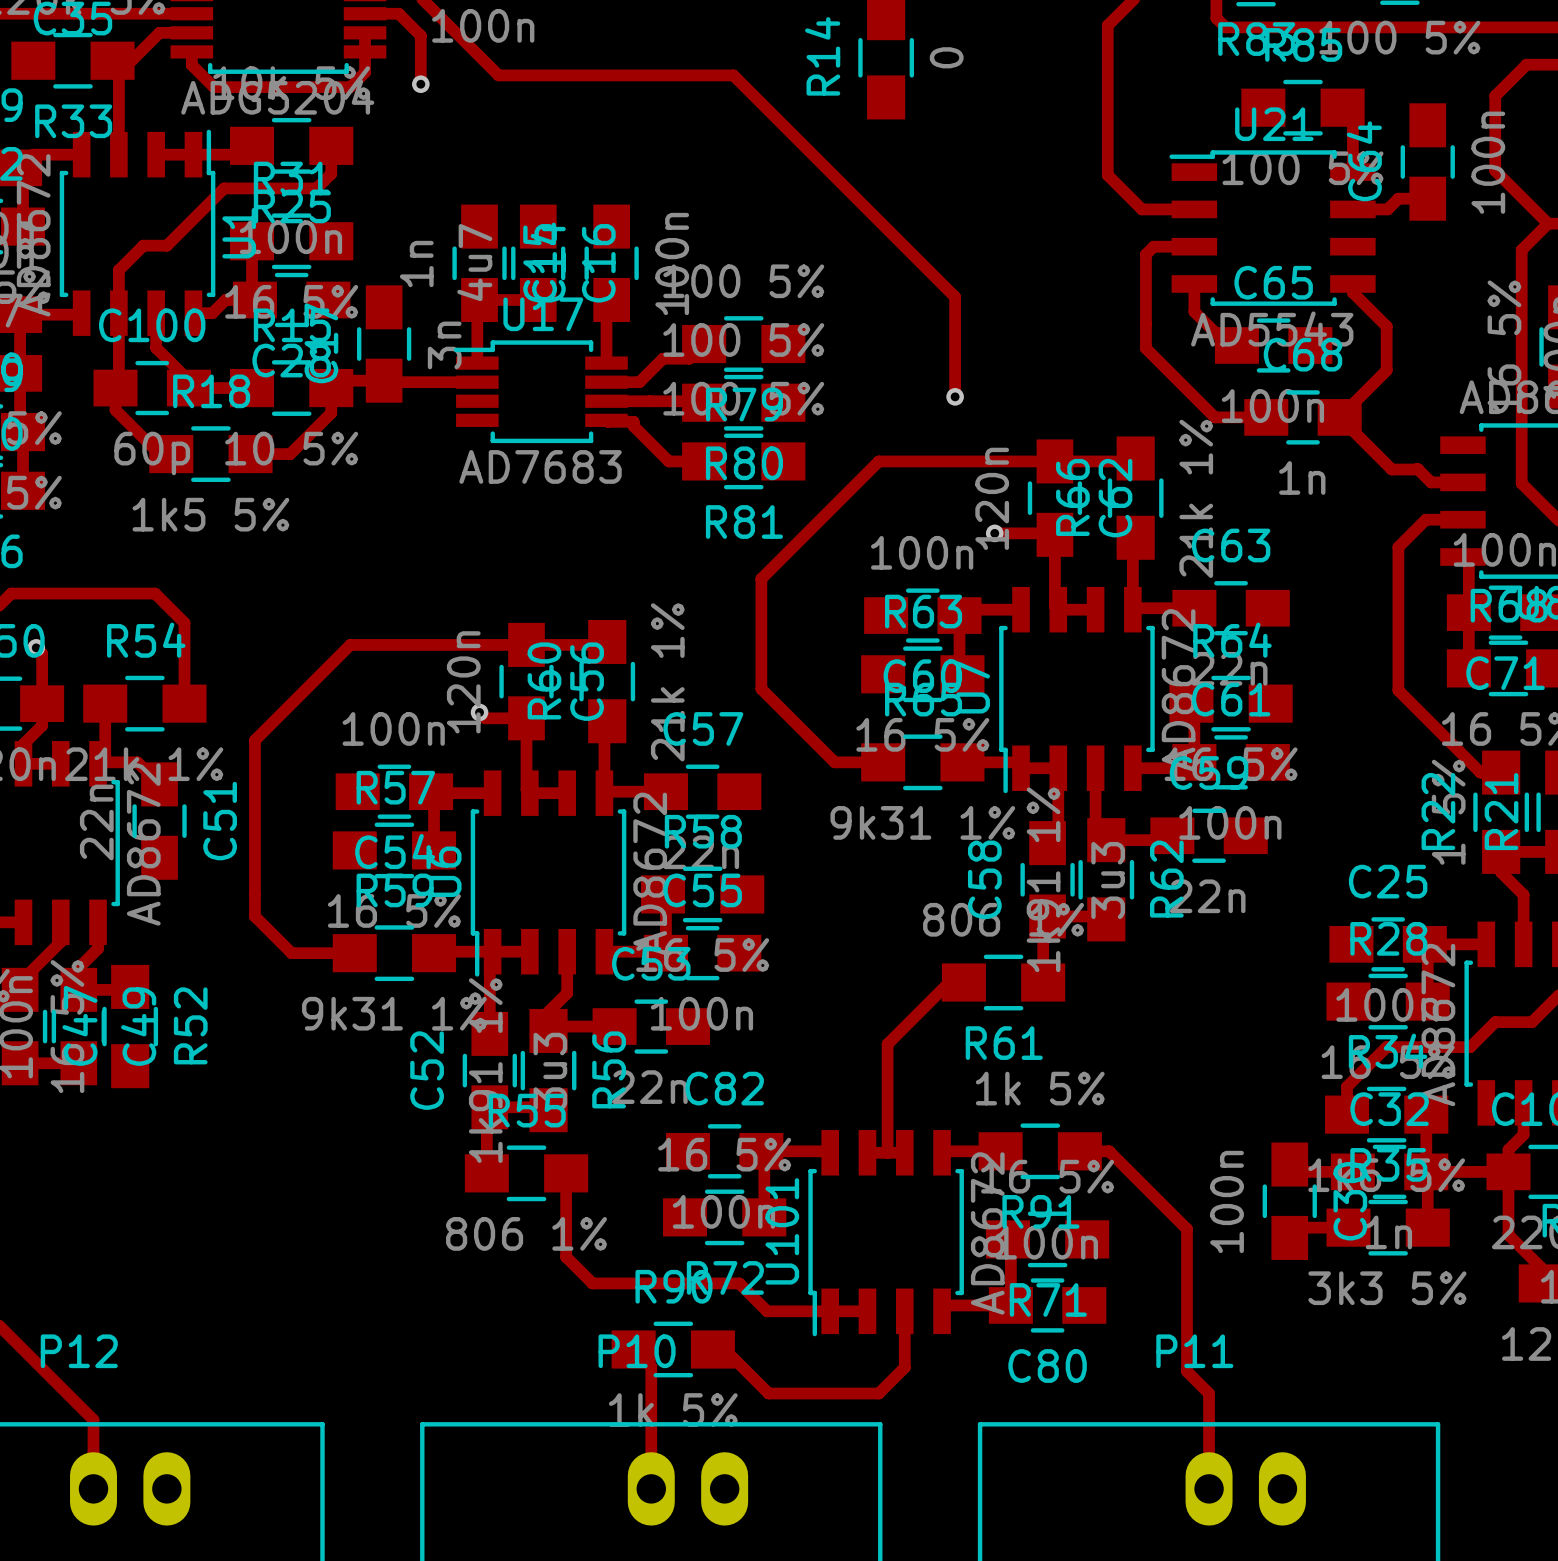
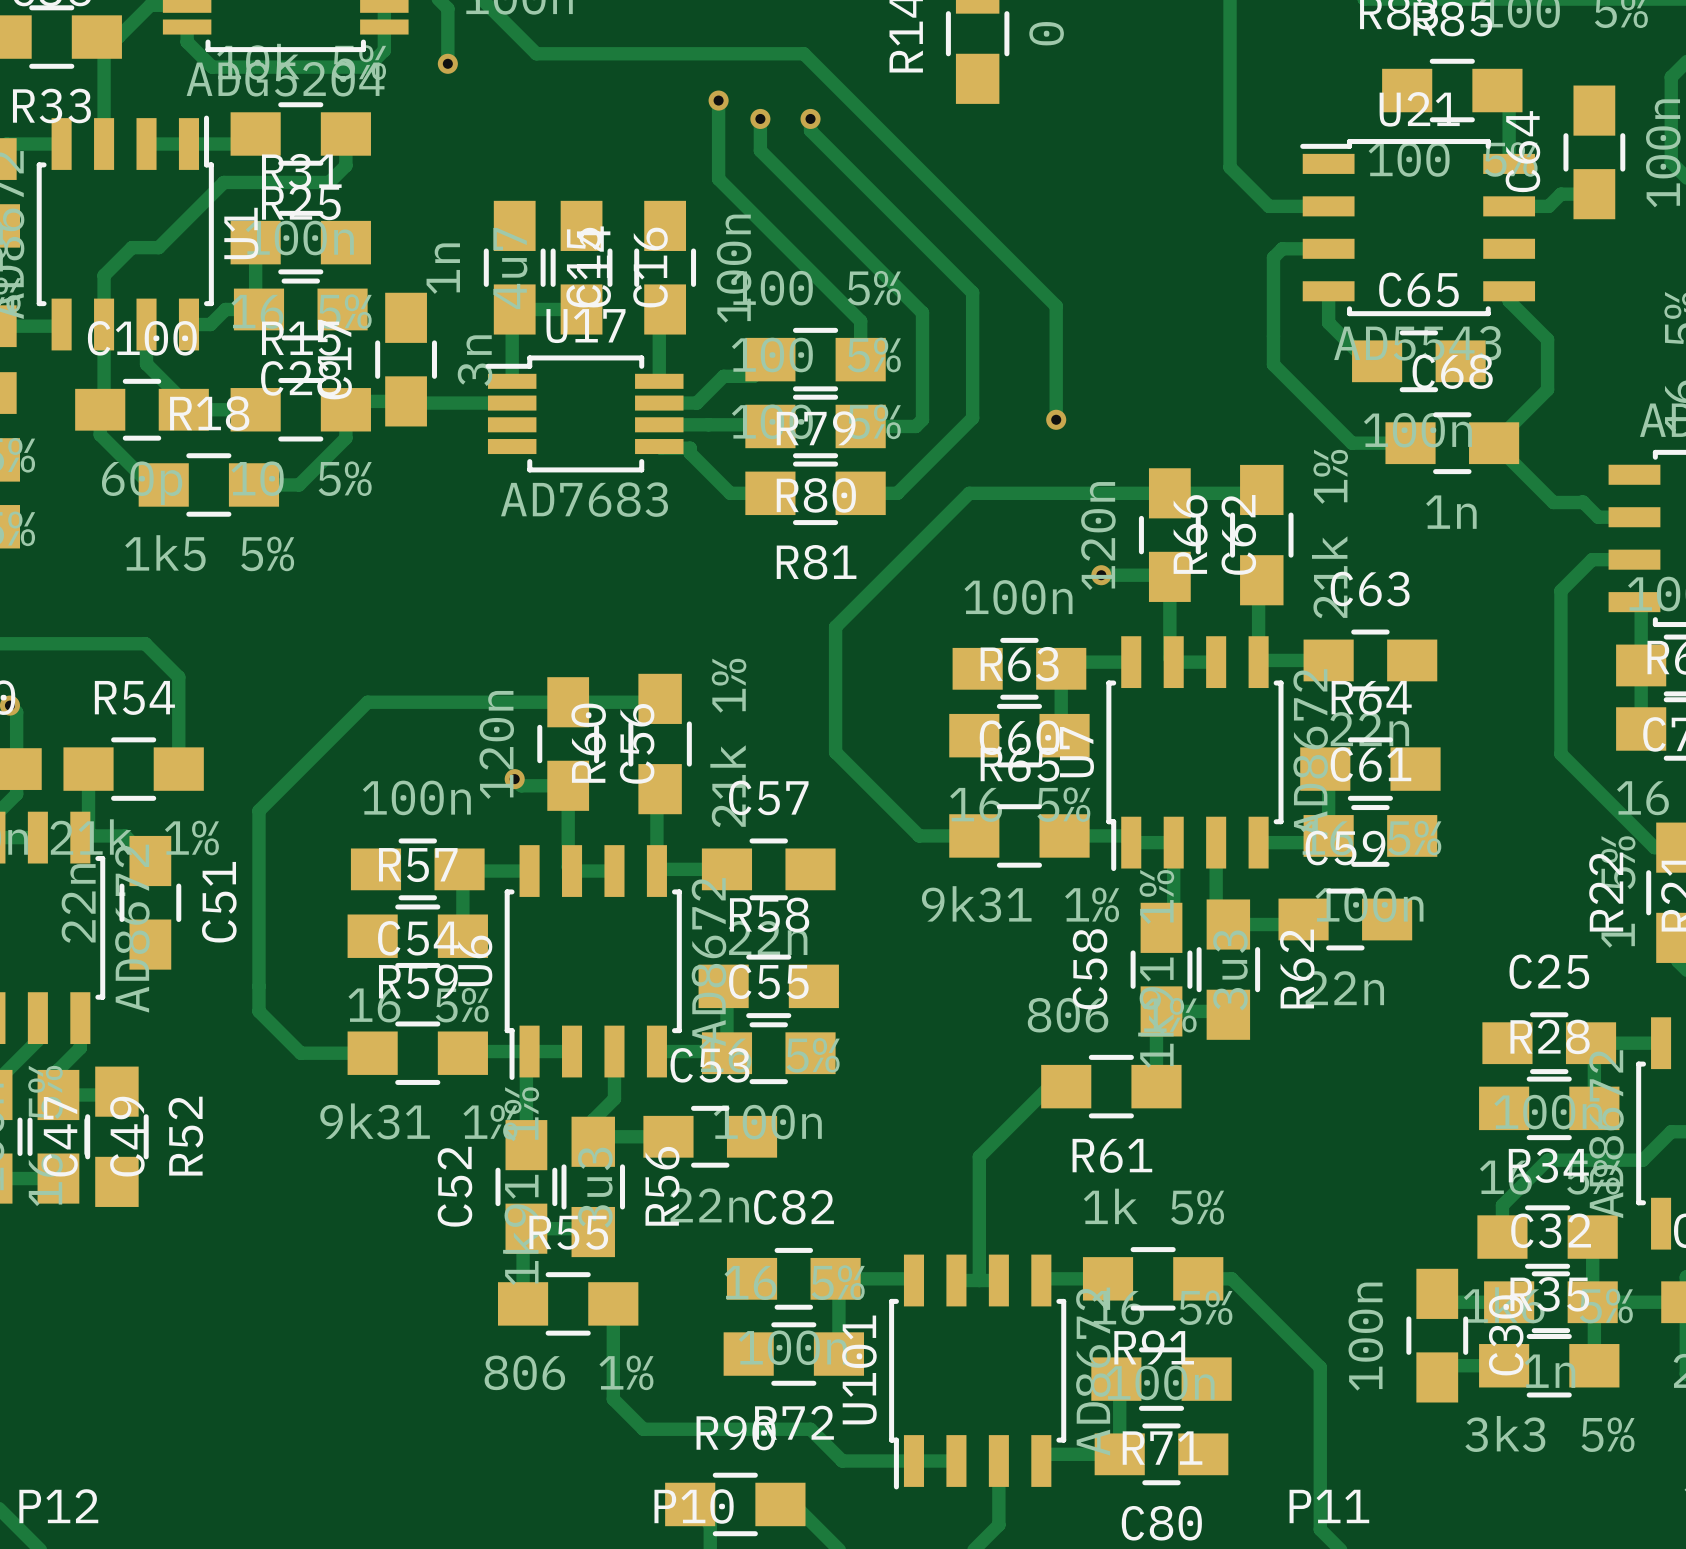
track: none -> (718, 100) (718, 179) (860, 321) (860, 359)
via: none -> (718, 100)
track: none -> (760, 118) (760, 150) (922, 312) (922, 419) (915, 426) (860, 426)
via: none -> (760, 118)
track: none -> (810, 118) (810, 130) (972, 292) (972, 418) (897, 493) (860, 493)
via: none -> (810, 118)

